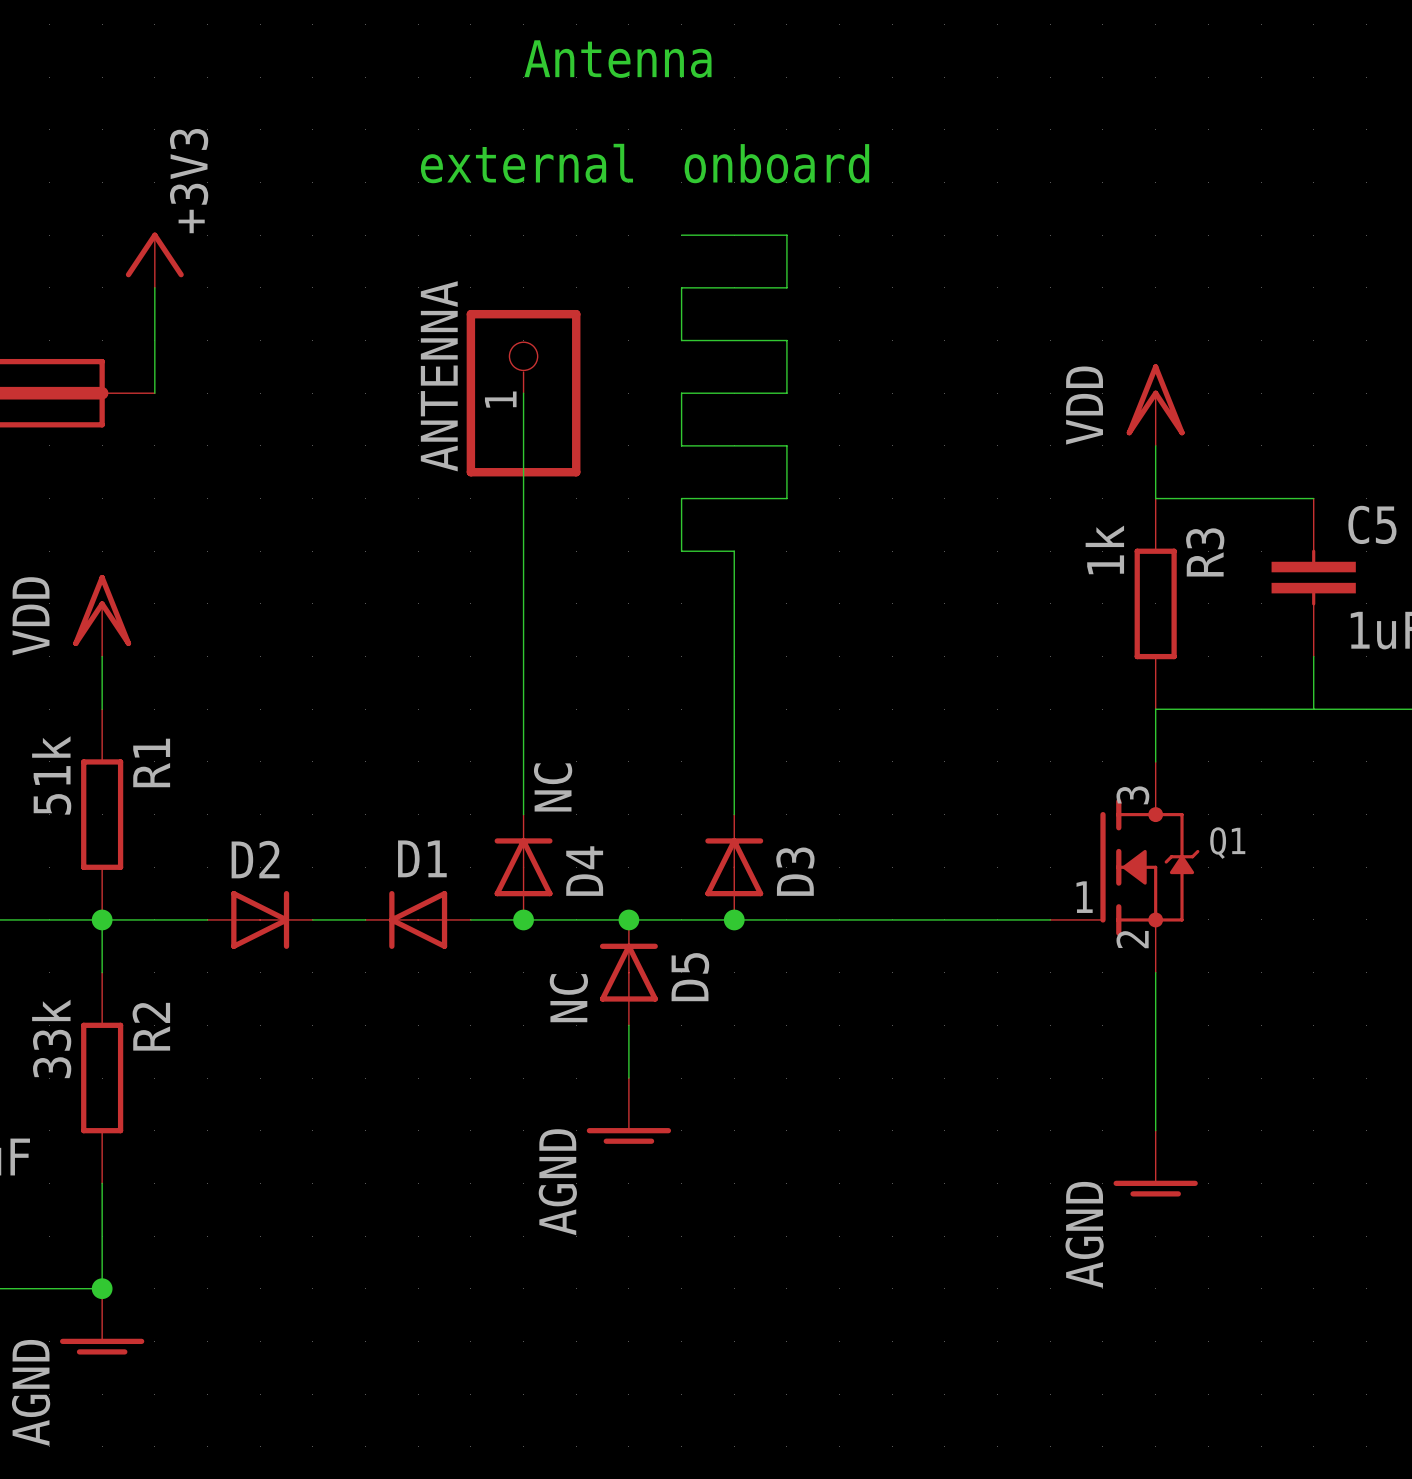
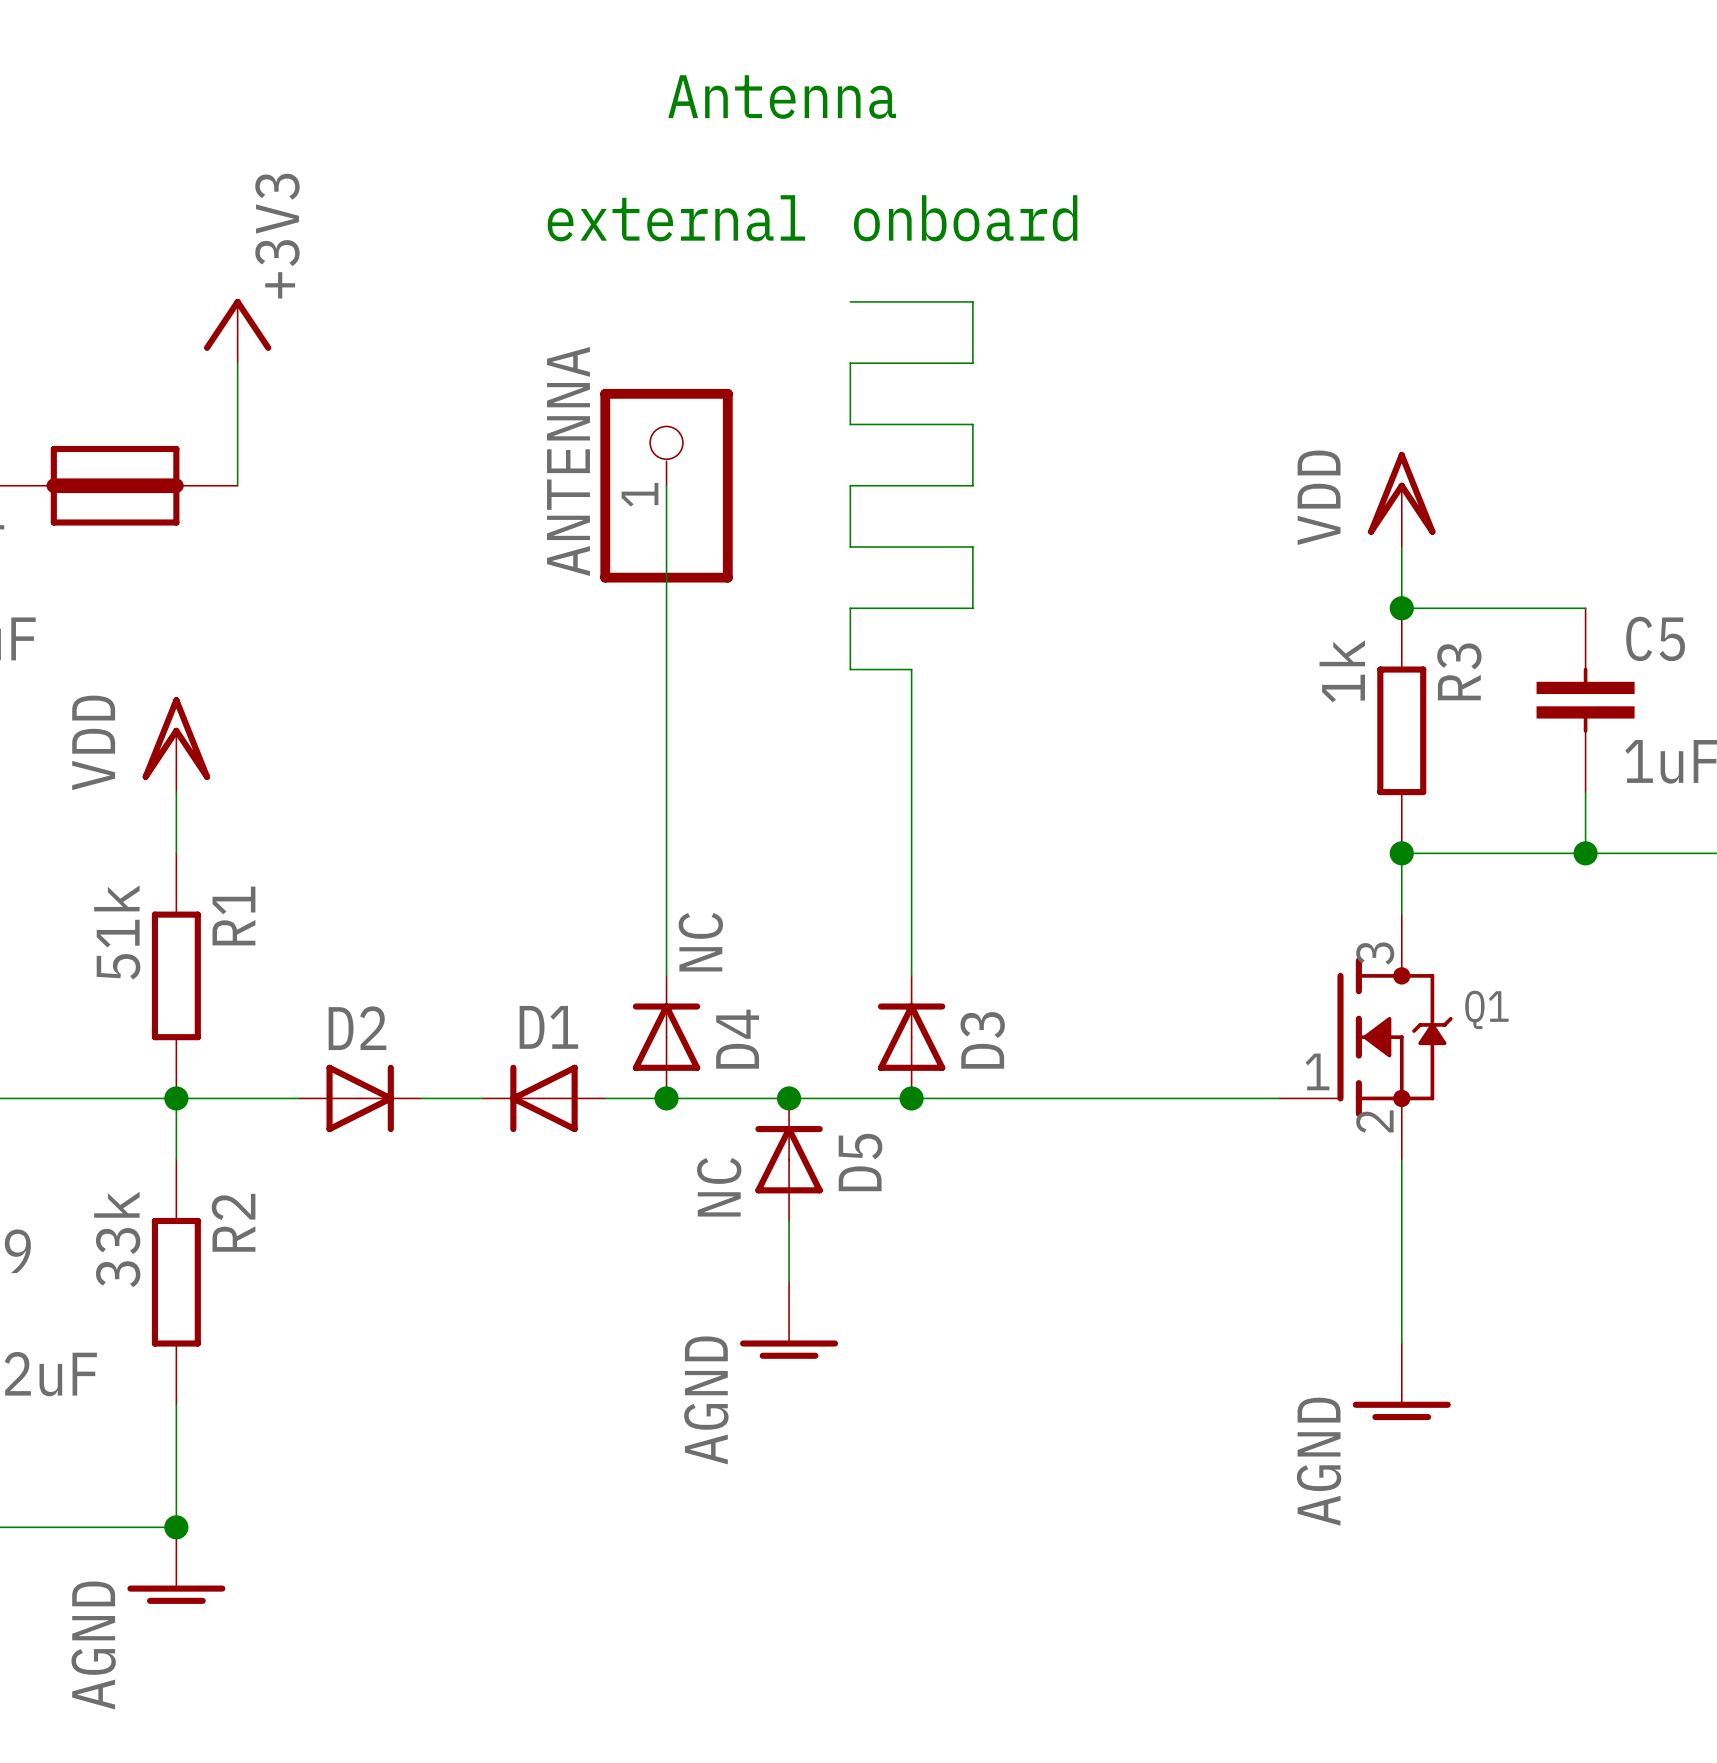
junction: none -> (1401, 608)
junction: none -> (1401, 853)
junction: none -> (1585, 853)

